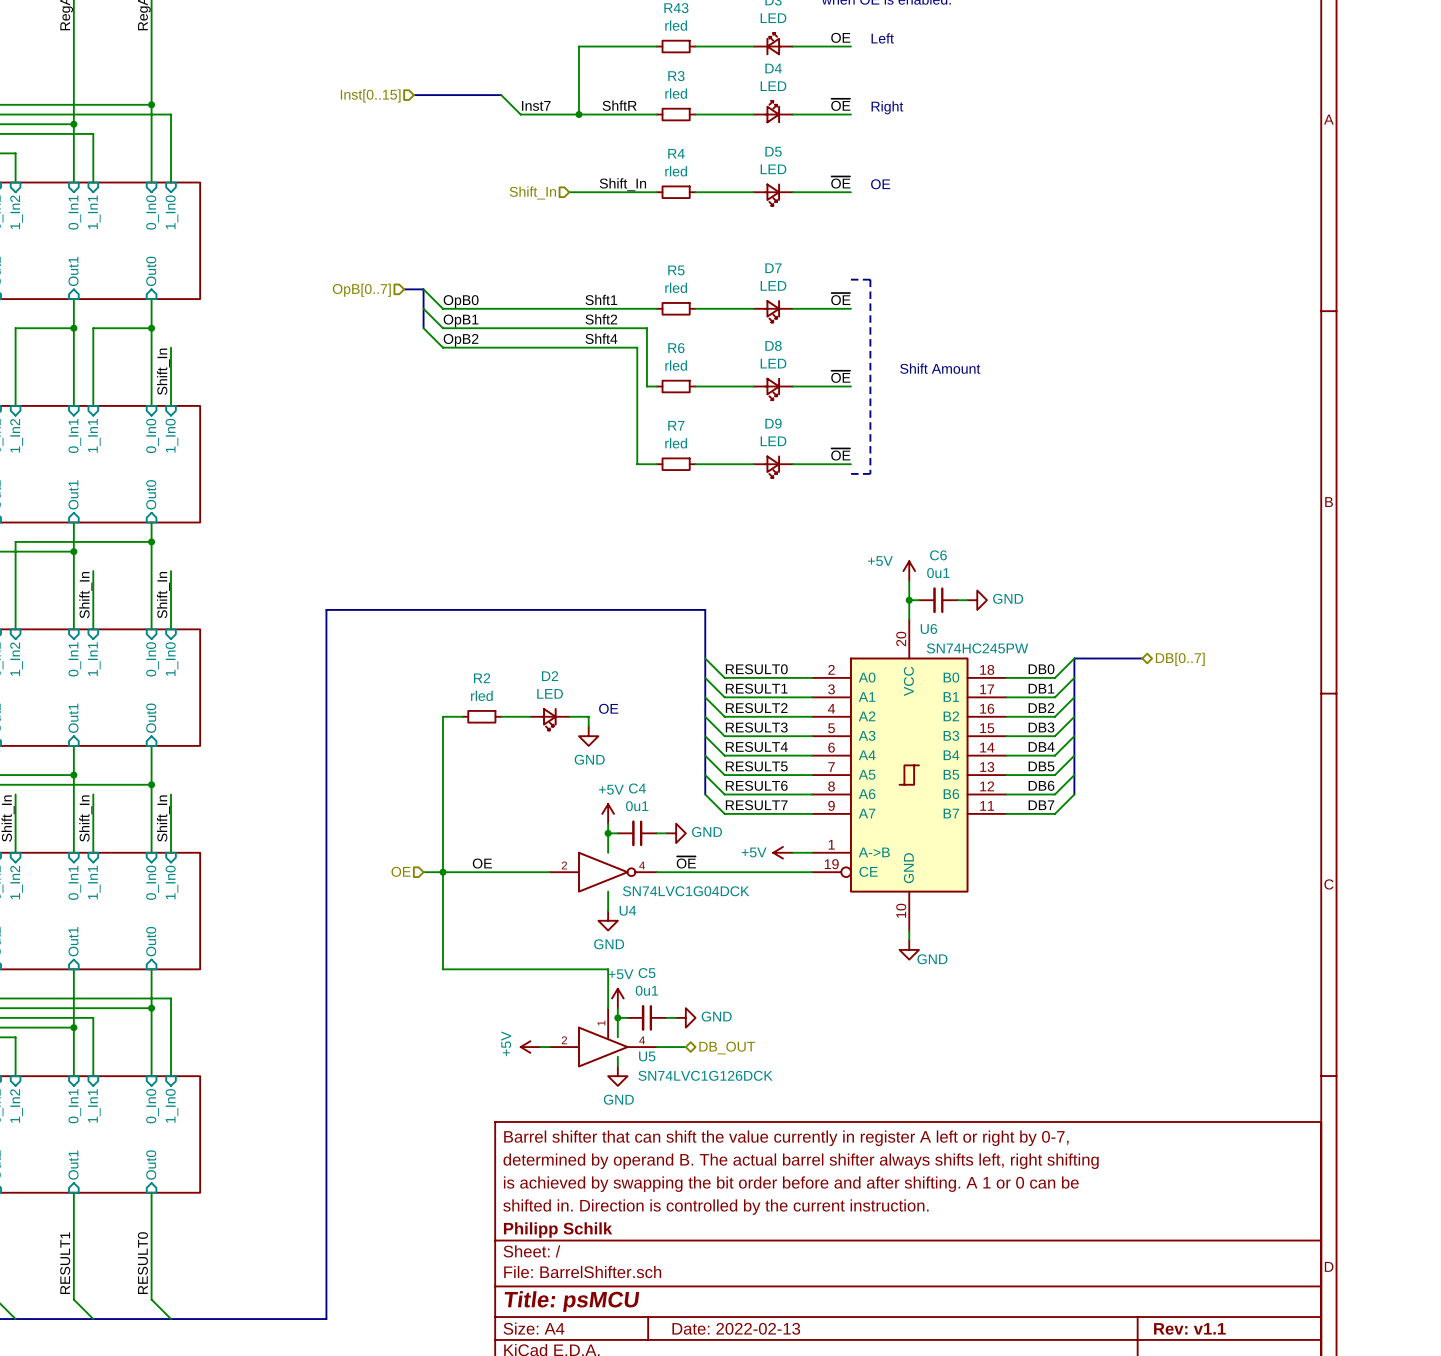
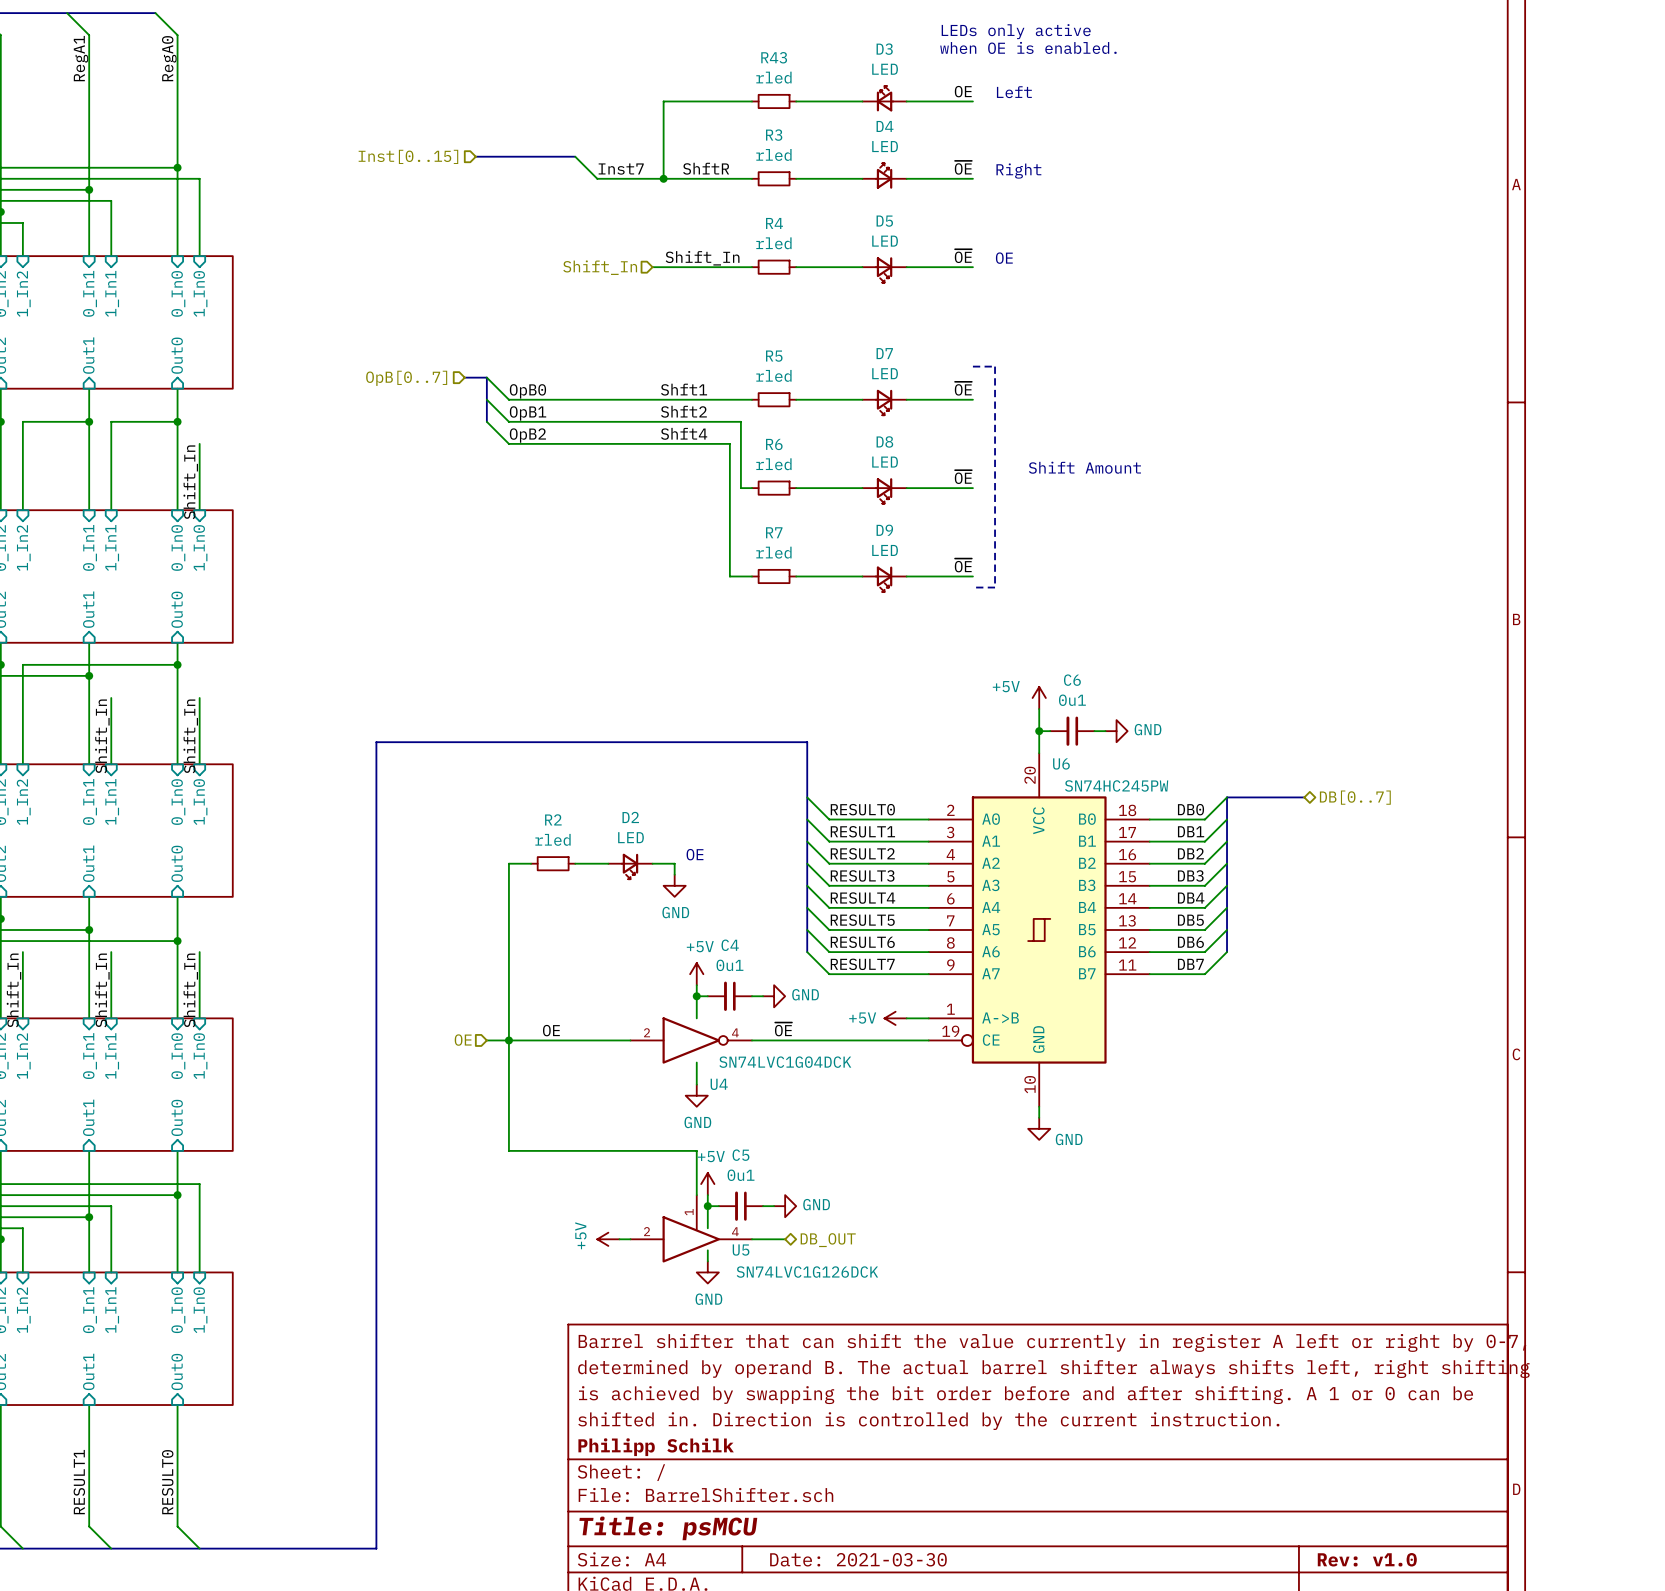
title block: Date: 2022-02-13 (736, 1328) -> Date: 2021-03-30 (858, 1559)
title block: Rev: v1.1 (1189, 1328) -> Rev: v1.0 (1367, 1559)

